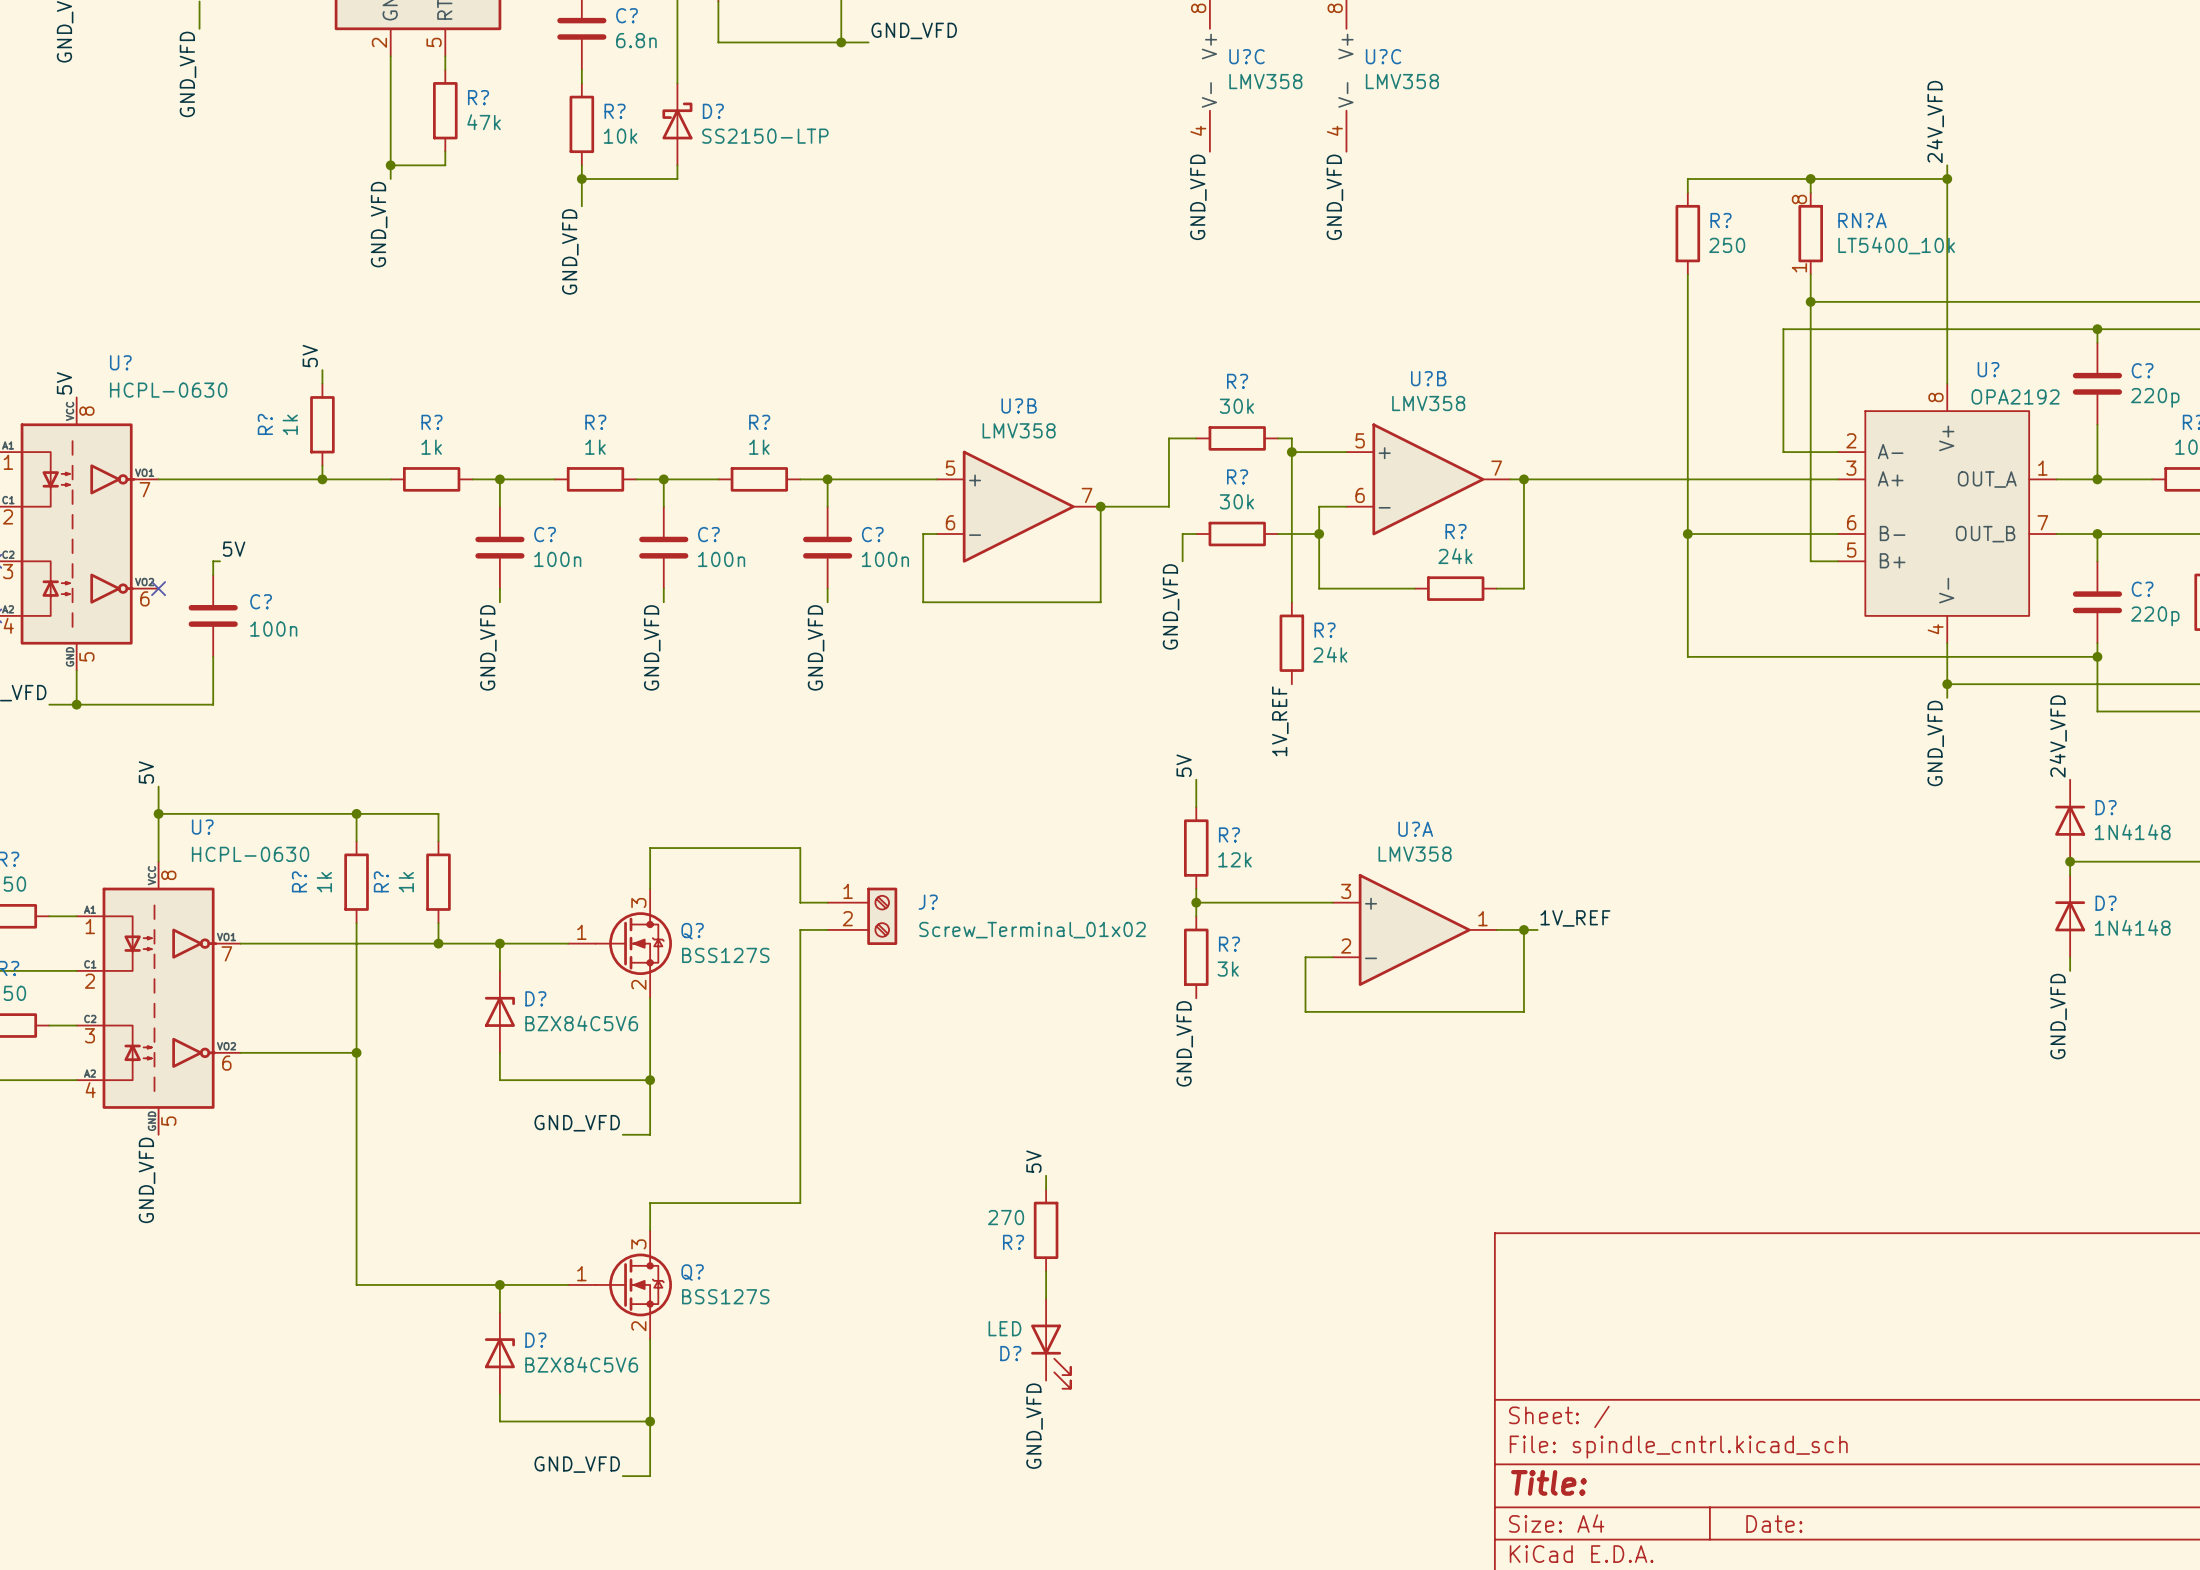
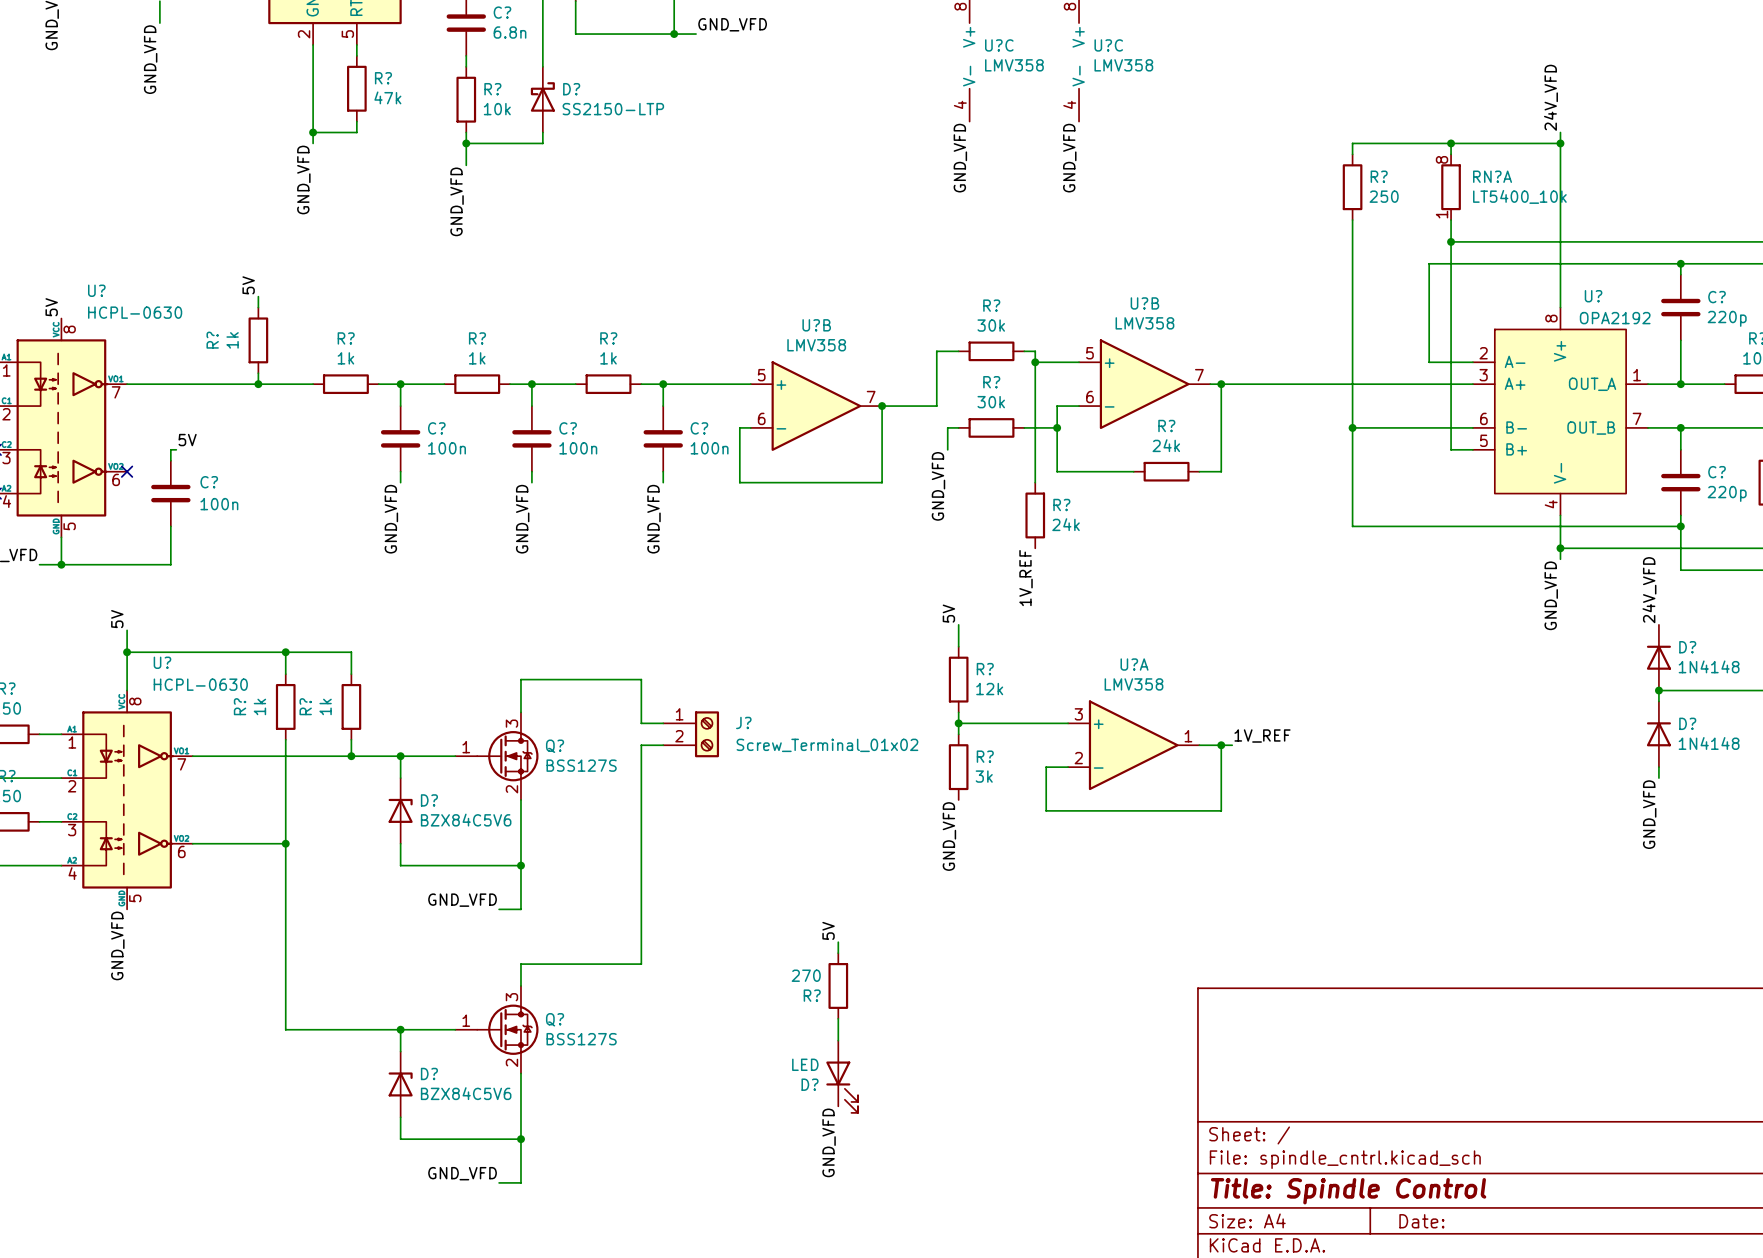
title block: Title: (1548, 1482) -> Title: Spindle Control (1348, 1191)

